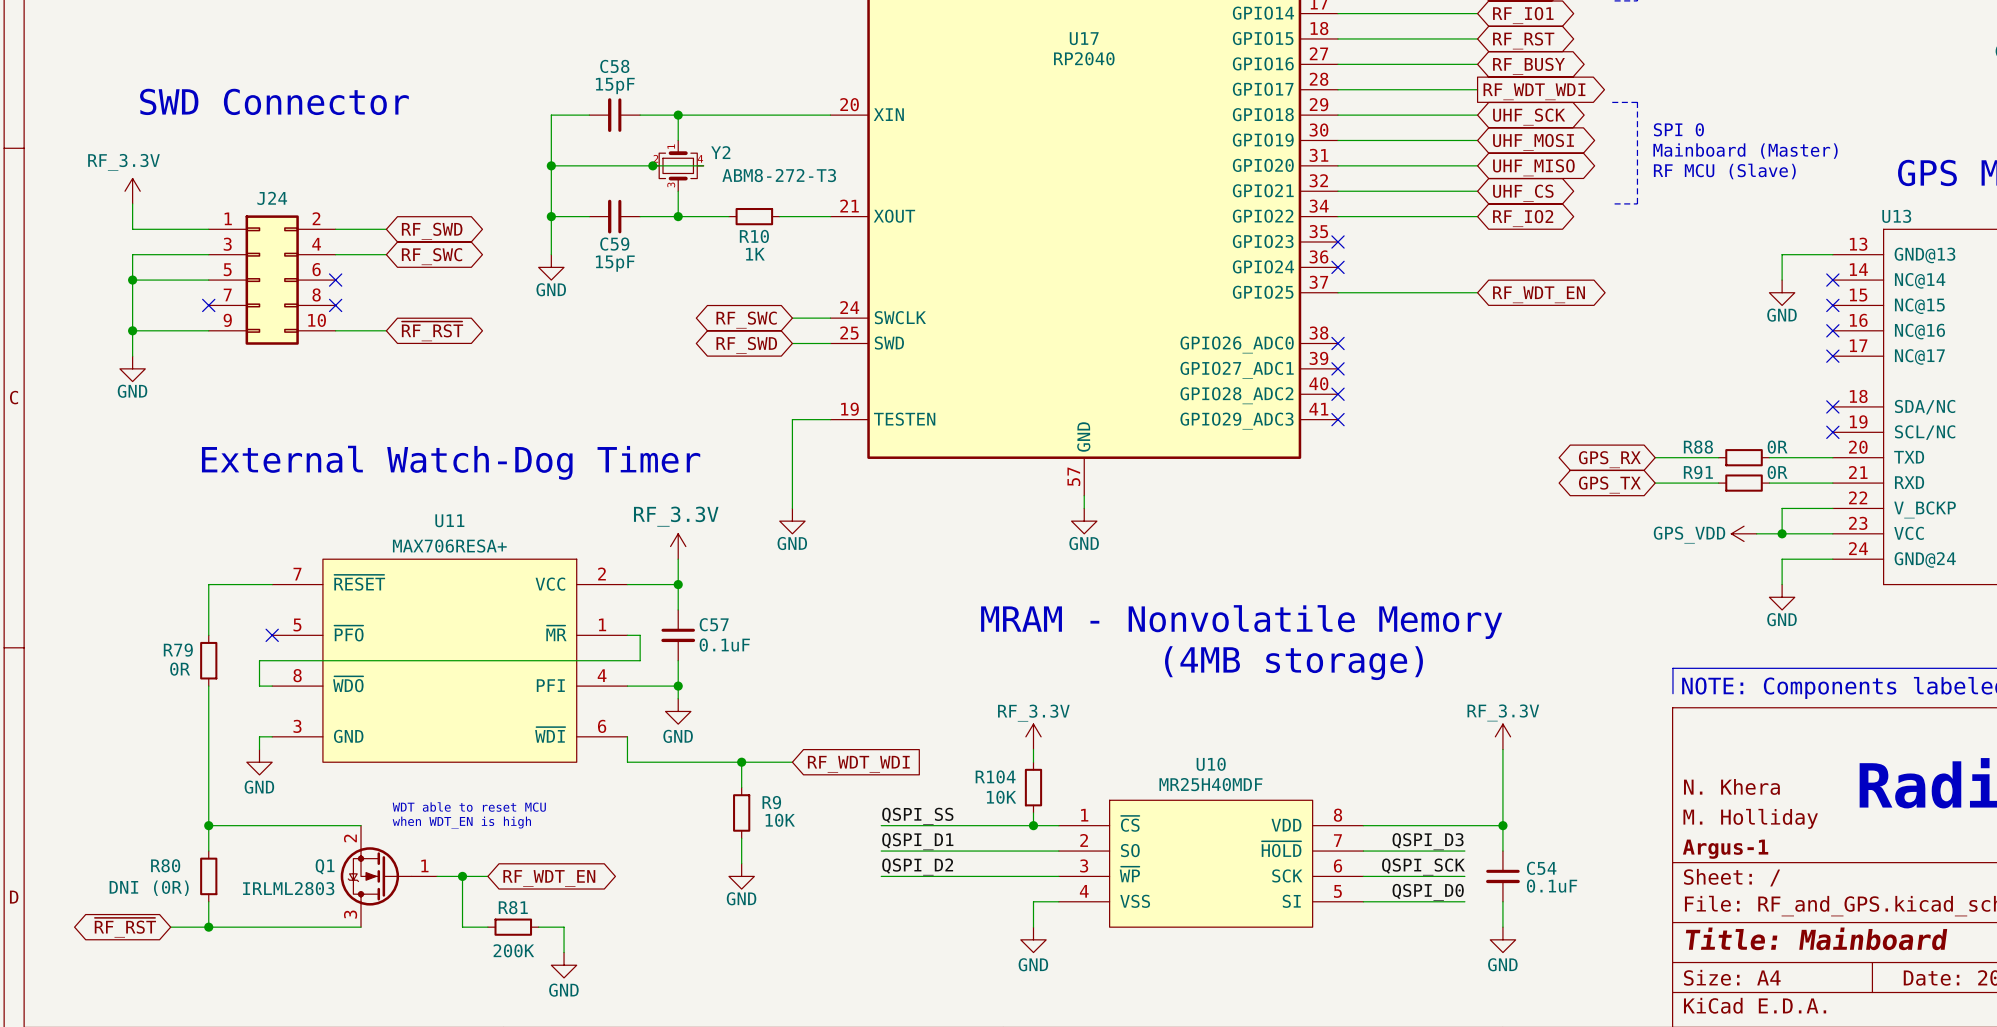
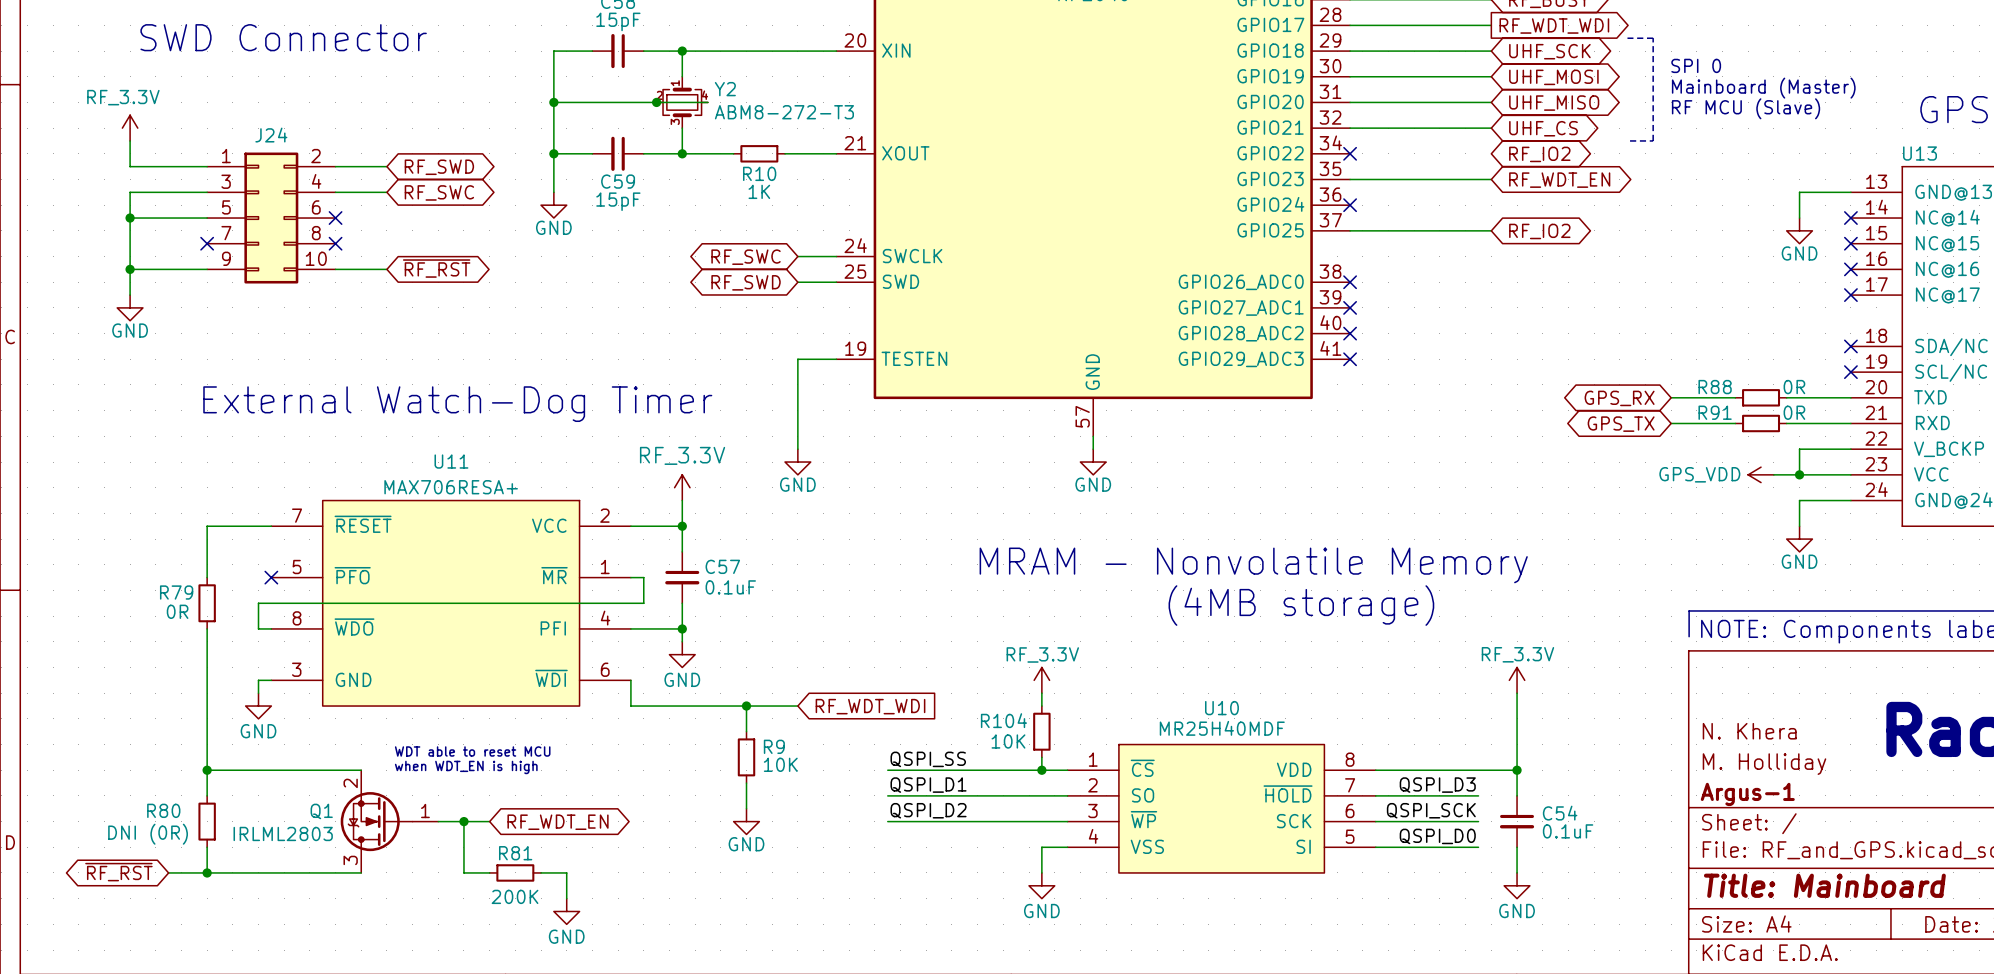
wire: (1338, 216) (1477, 216) -> (1350, 179) (1491, 179)
no-connect mark position: (1338, 241) -> (1350, 153)
global label: none -> RF_WDT_EN (1559, 180)
global label: RF_WDT_EN (1539, 294) -> RF_IO2 (1539, 231)

